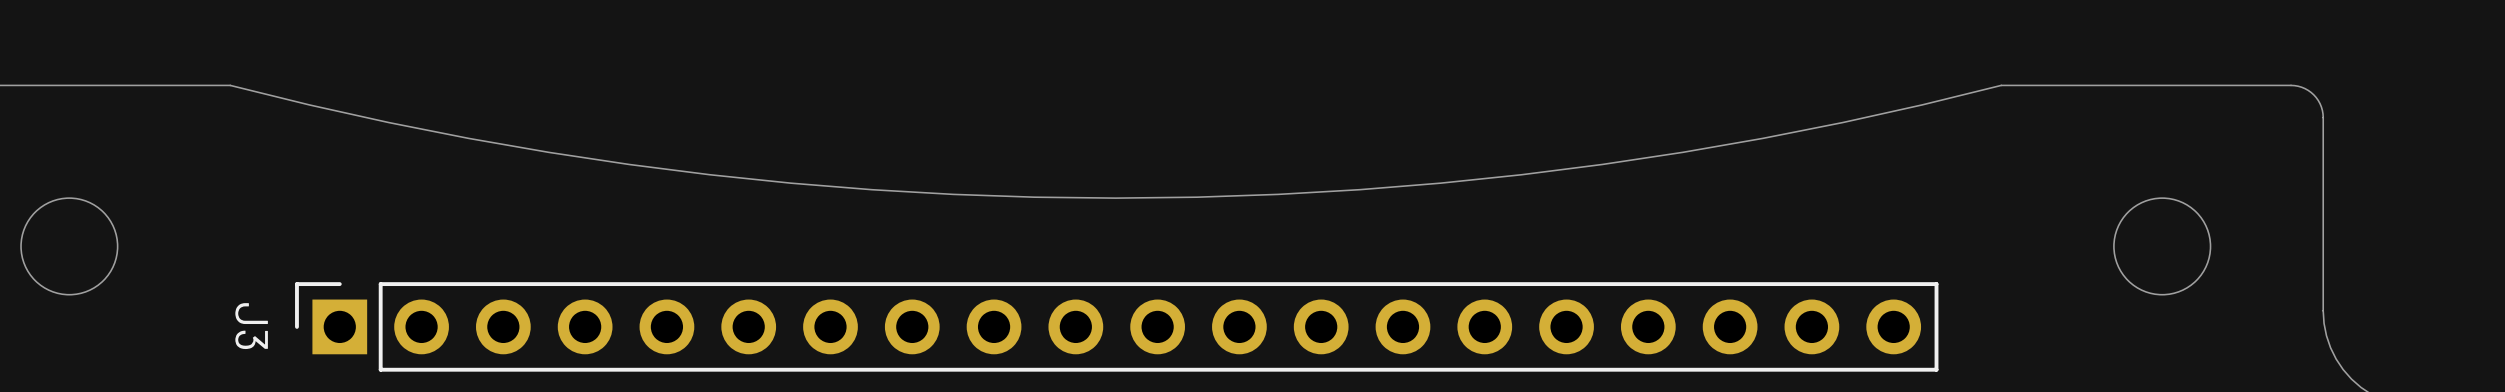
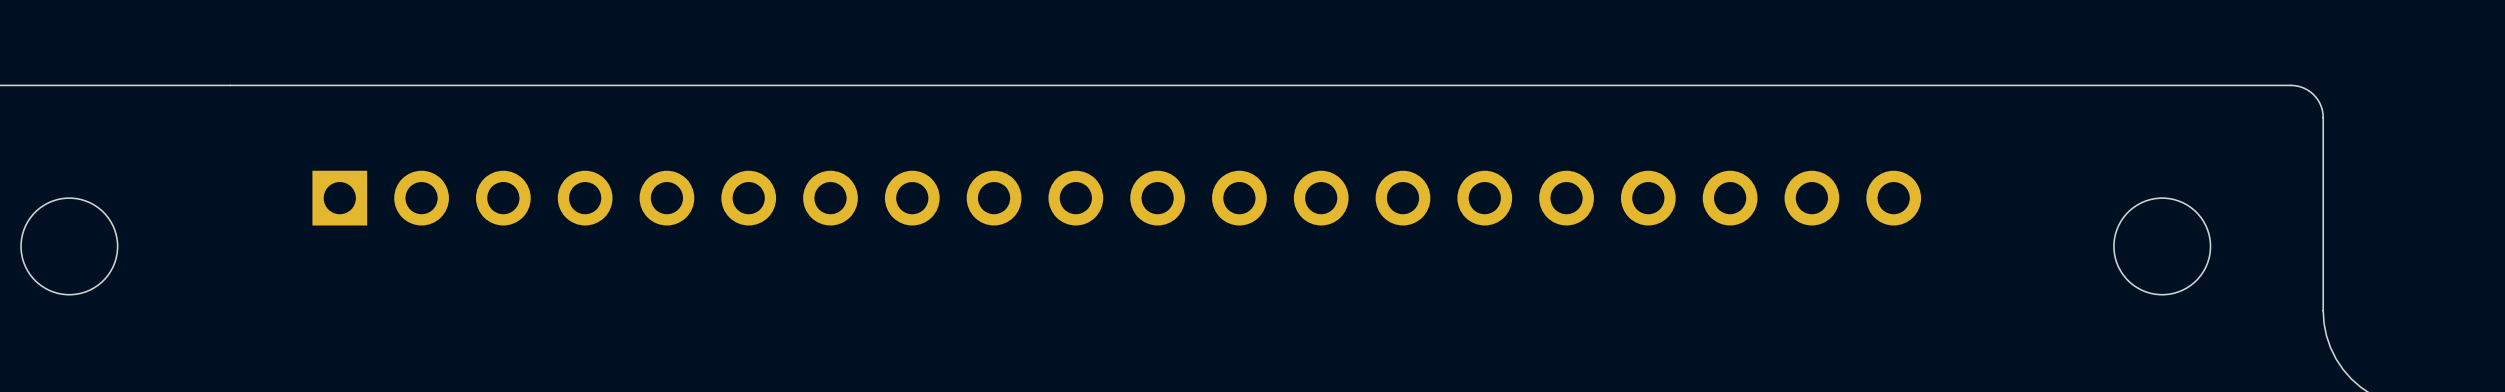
board edge: (2001, 85) (1922, 104) (1763, 138) (1682, 152) (1521, 174) (1359, 189) (1197, 197) (1115, 198) (1034, 197) (871, 189) (709, 174) (548, 152) (468, 138) (388, 122) (230, 85) -> (2001, 85) (230, 85)
J3 side: bottom (1116, 326) -> top (1116, 198)

